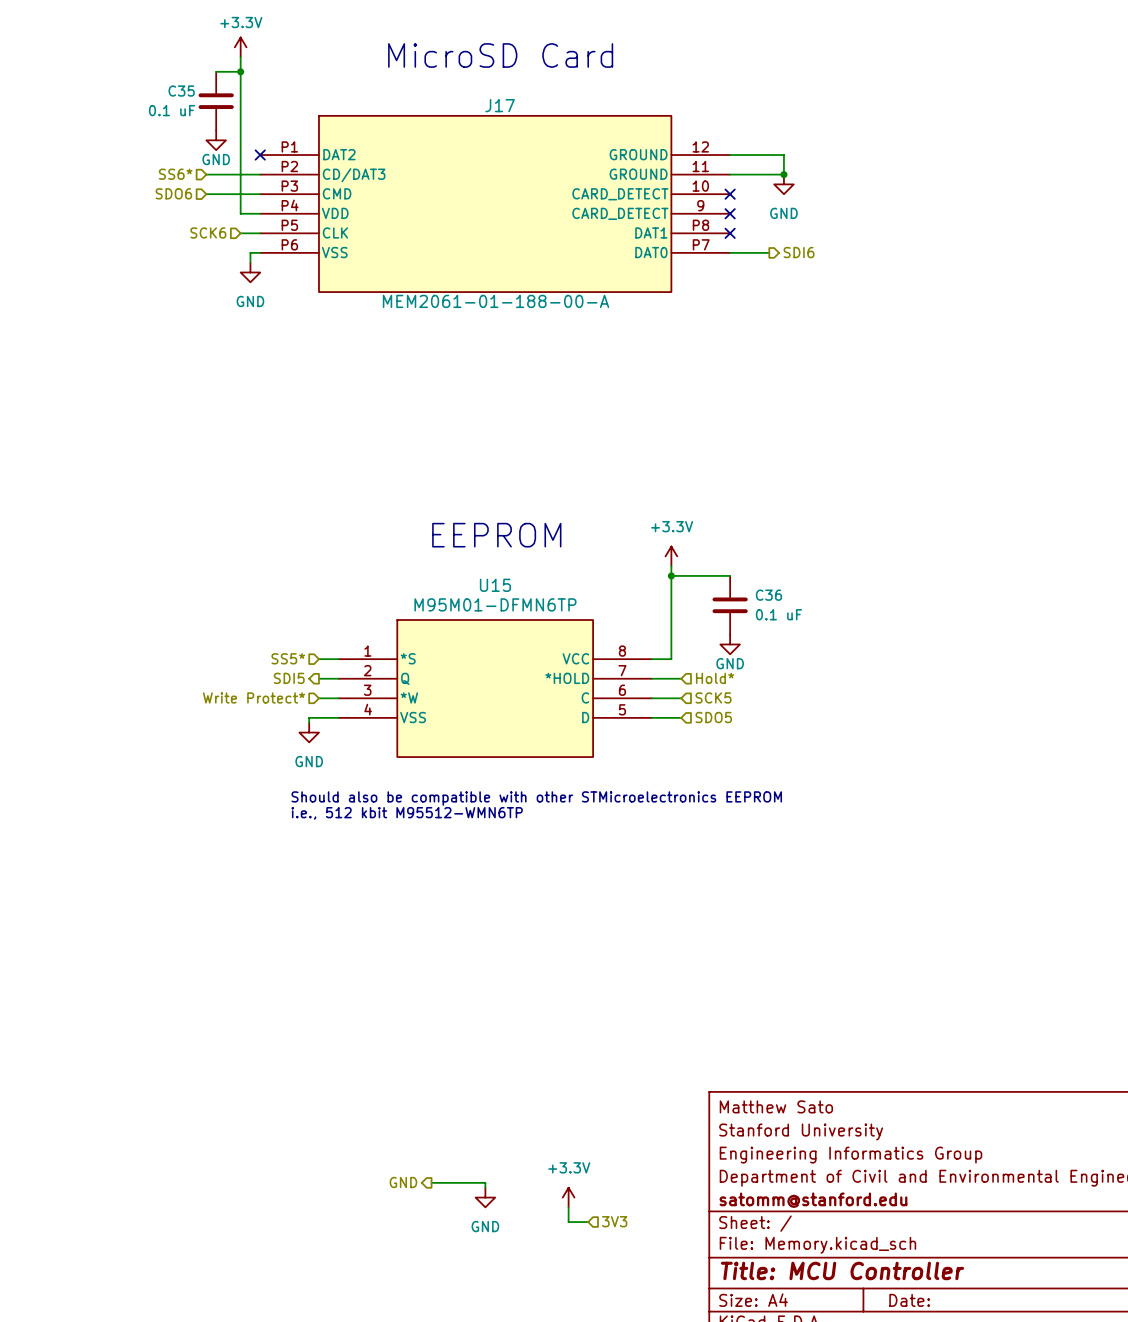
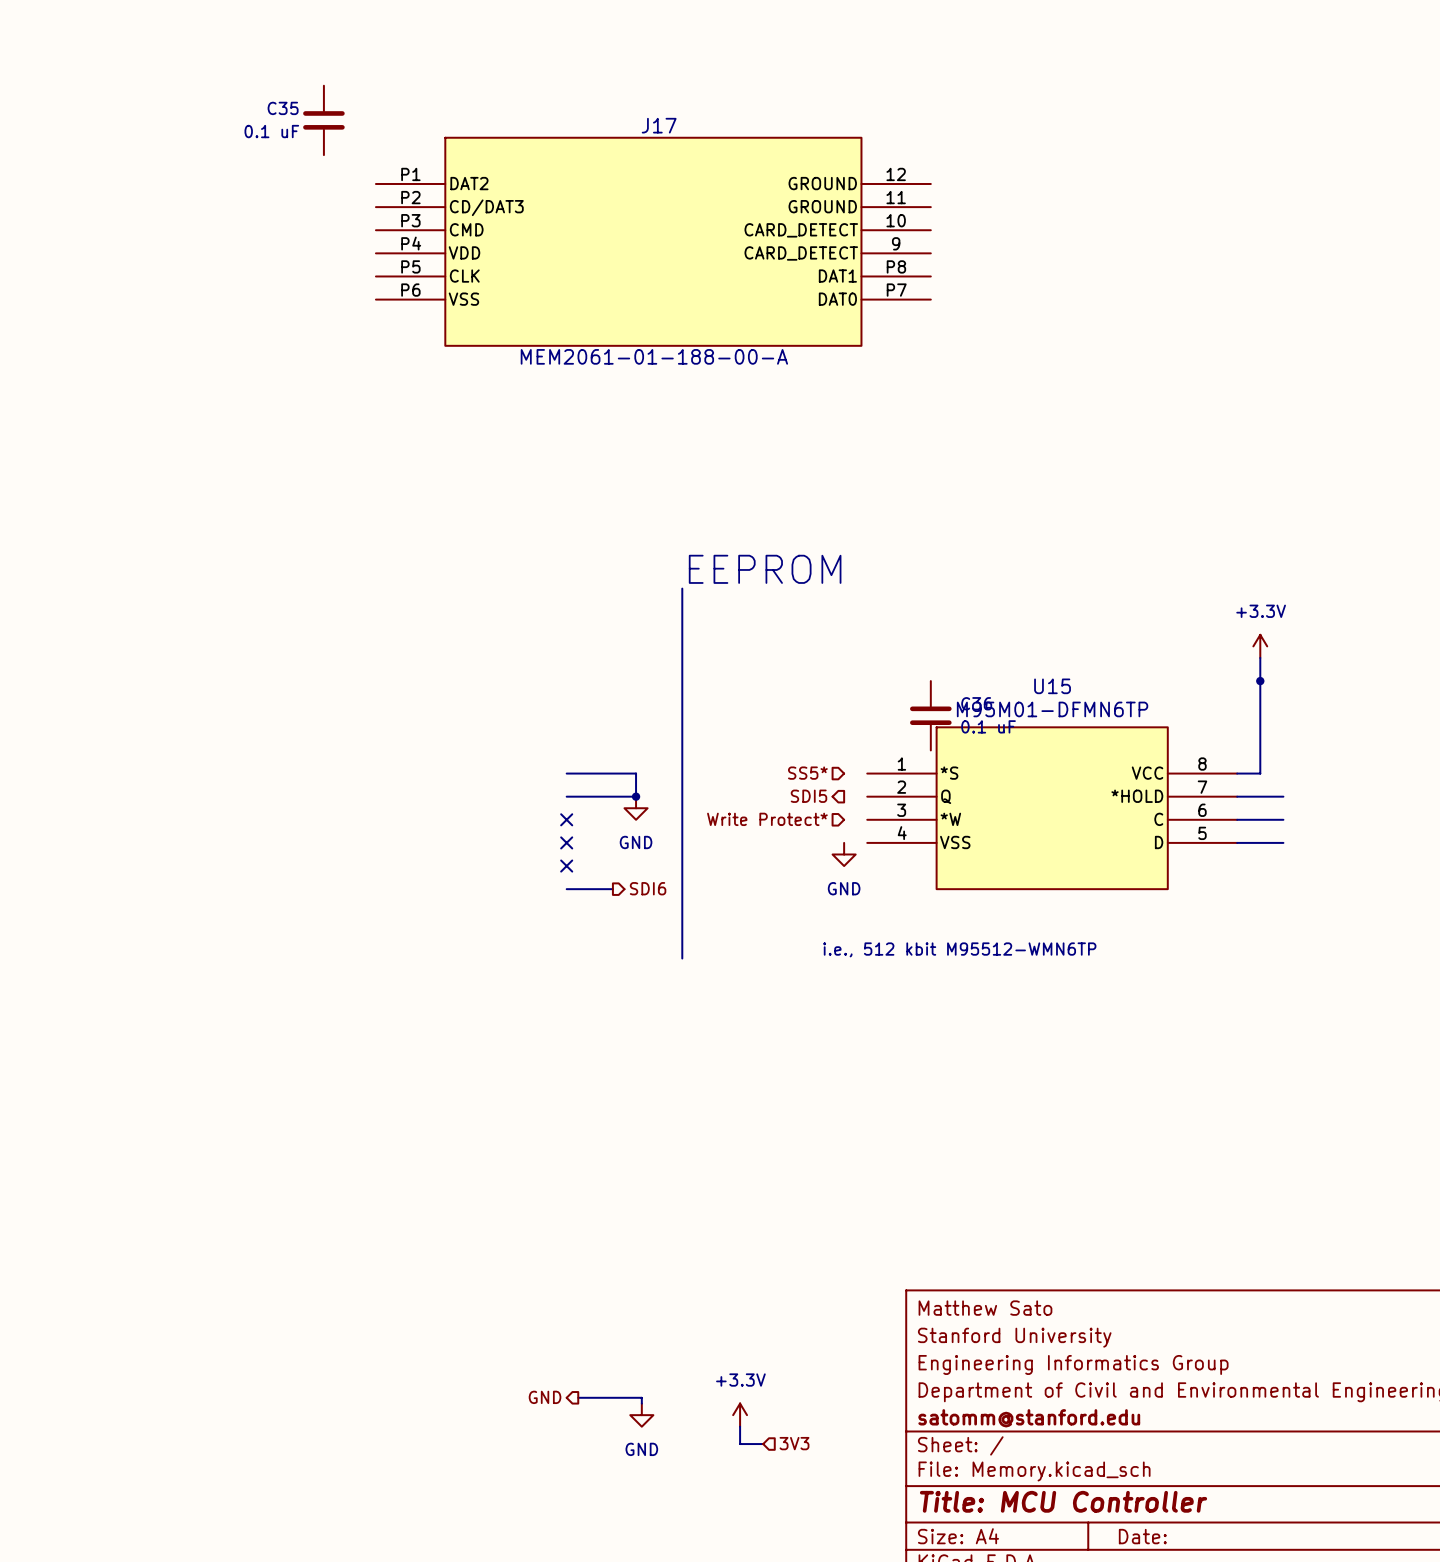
power symbol: +3.3V (240, 47) -> none
text: MicroSD Card (500, 55) -> none
wire: (240, 57) (240, 213) (260, 213) -> none
wire: (216, 71) (240, 71) -> none
junction: (240, 71) -> none
power symbol: GND (216, 140) -> none
no-connect mark: (260, 155) -> none
wire: (730, 155) (783, 155) (783, 174) (730, 174) -> none
hierarchical label: SS6* (175, 174) -> none
wire: (206, 174) (260, 174) -> none
junction: (783, 174) -> none
power symbol: GND (783, 184) -> none
hierarchical label: SDO6 (173, 193) -> none
wire: (206, 194) (260, 194) -> none
no-connect mark: (730, 194) -> none
no-connect mark: (730, 213) -> none
hierarchical label: SCK6 (208, 232) -> none
wire: (240, 233) (260, 233) -> none
no-connect mark: (730, 233) -> none
wire: (260, 252) (250, 252) (250, 262) -> none
wire: (730, 252) (769, 252) -> none
hierarchical label: SDI6 (799, 252) -> none
power symbol: GND (250, 272) -> none
line: none -> (682, 588) (682, 958)
text position: EEPROM (496, 535) -> EEPROM (765, 569)
power symbol: none -> +3.3V (1260, 646)
power symbol: +3.3V (671, 556) -> none
wire: none -> (1260, 657) (1260, 773) (1237, 773)
wire: (671, 566) (671, 659) (651, 659) -> none
wire: (671, 575) (730, 575) -> none
junction: (671, 575) -> none
junction: none -> (1260, 681)
power symbol position: GND (730, 644) -> GND (844, 854)
hierarchical label: none -> SS5* (807, 773)
hierarchical label: SS5* (288, 658) -> none
wire: (318, 659) (338, 659) -> none
power symbol text position: GND (730, 663) -> GND (844, 888)
junction: none -> (636, 796)
hierarchical label: none -> SDI5 (808, 796)
wire: none -> (1237, 796) (1283, 796)
hierarchical label: SDI5 (289, 678) -> none
wire: (318, 678) (338, 678) -> none
wire: (651, 678) (681, 678) -> none
hierarchical label: Hold* (715, 678) -> none
power symbol: none -> GND (636, 808)
U15 position: (495, 688) -> (1052, 808)
no-connect mark: none -> (566, 819)
hierarchical label: none -> Write Protect* (767, 819)
wire: none -> (1237, 819) (1283, 819)
hierarchical label: Write Protect* (254, 697) -> none
hierarchical label: SCK5 (713, 697) -> none
wire: (318, 698) (338, 698) -> none
wire: (651, 698) (681, 698) -> none
no-connect mark: none -> (566, 842)
wire: none -> (1237, 842) (1283, 842)
wire: (338, 717) (309, 717) (309, 722) -> none
wire: (651, 717) (681, 717) -> none
hierarchical label: SDO5 (713, 717) -> none
power symbol: GND (309, 732) -> none
no-connect mark: none -> (566, 866)
hierarchical label: none -> SDI6 (648, 888)
text: Should also be compatible with other STMicroelectronics EEPROM (536, 798) -> none
text: none -> i.e., 512 kbit M95512-WMN6TP (959, 949)
text: i.e., 512 kbit M95512-WMN6TP (407, 813) -> none

